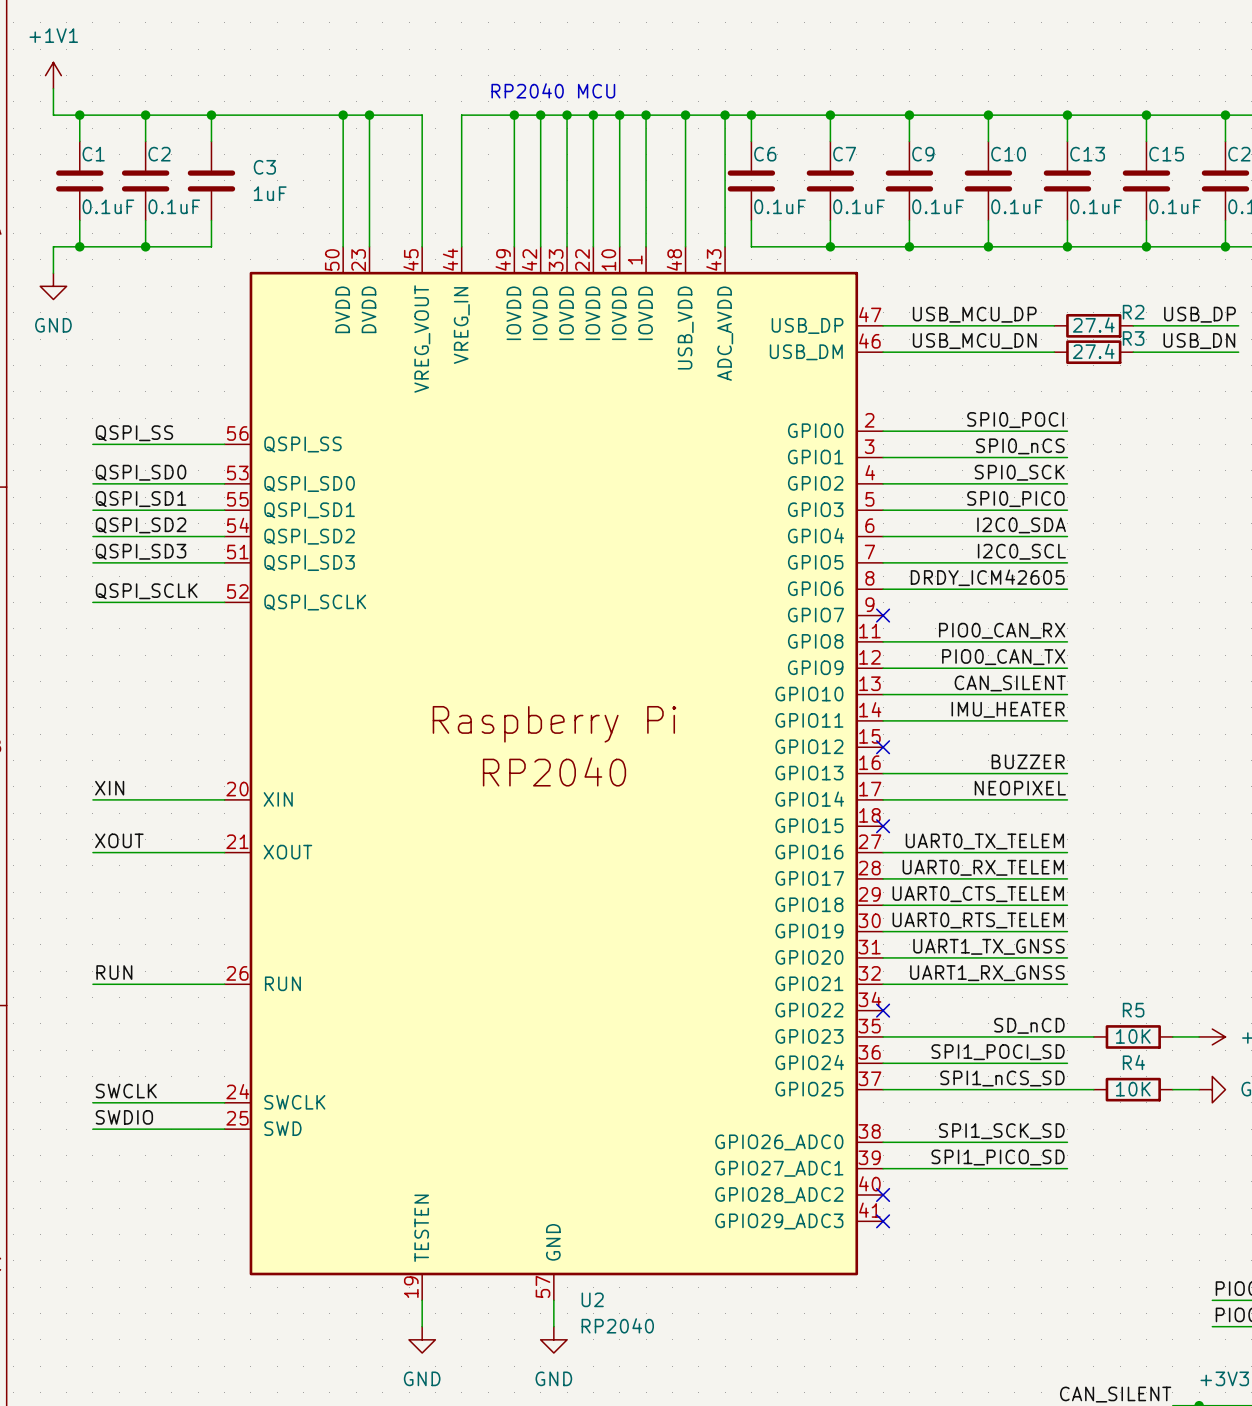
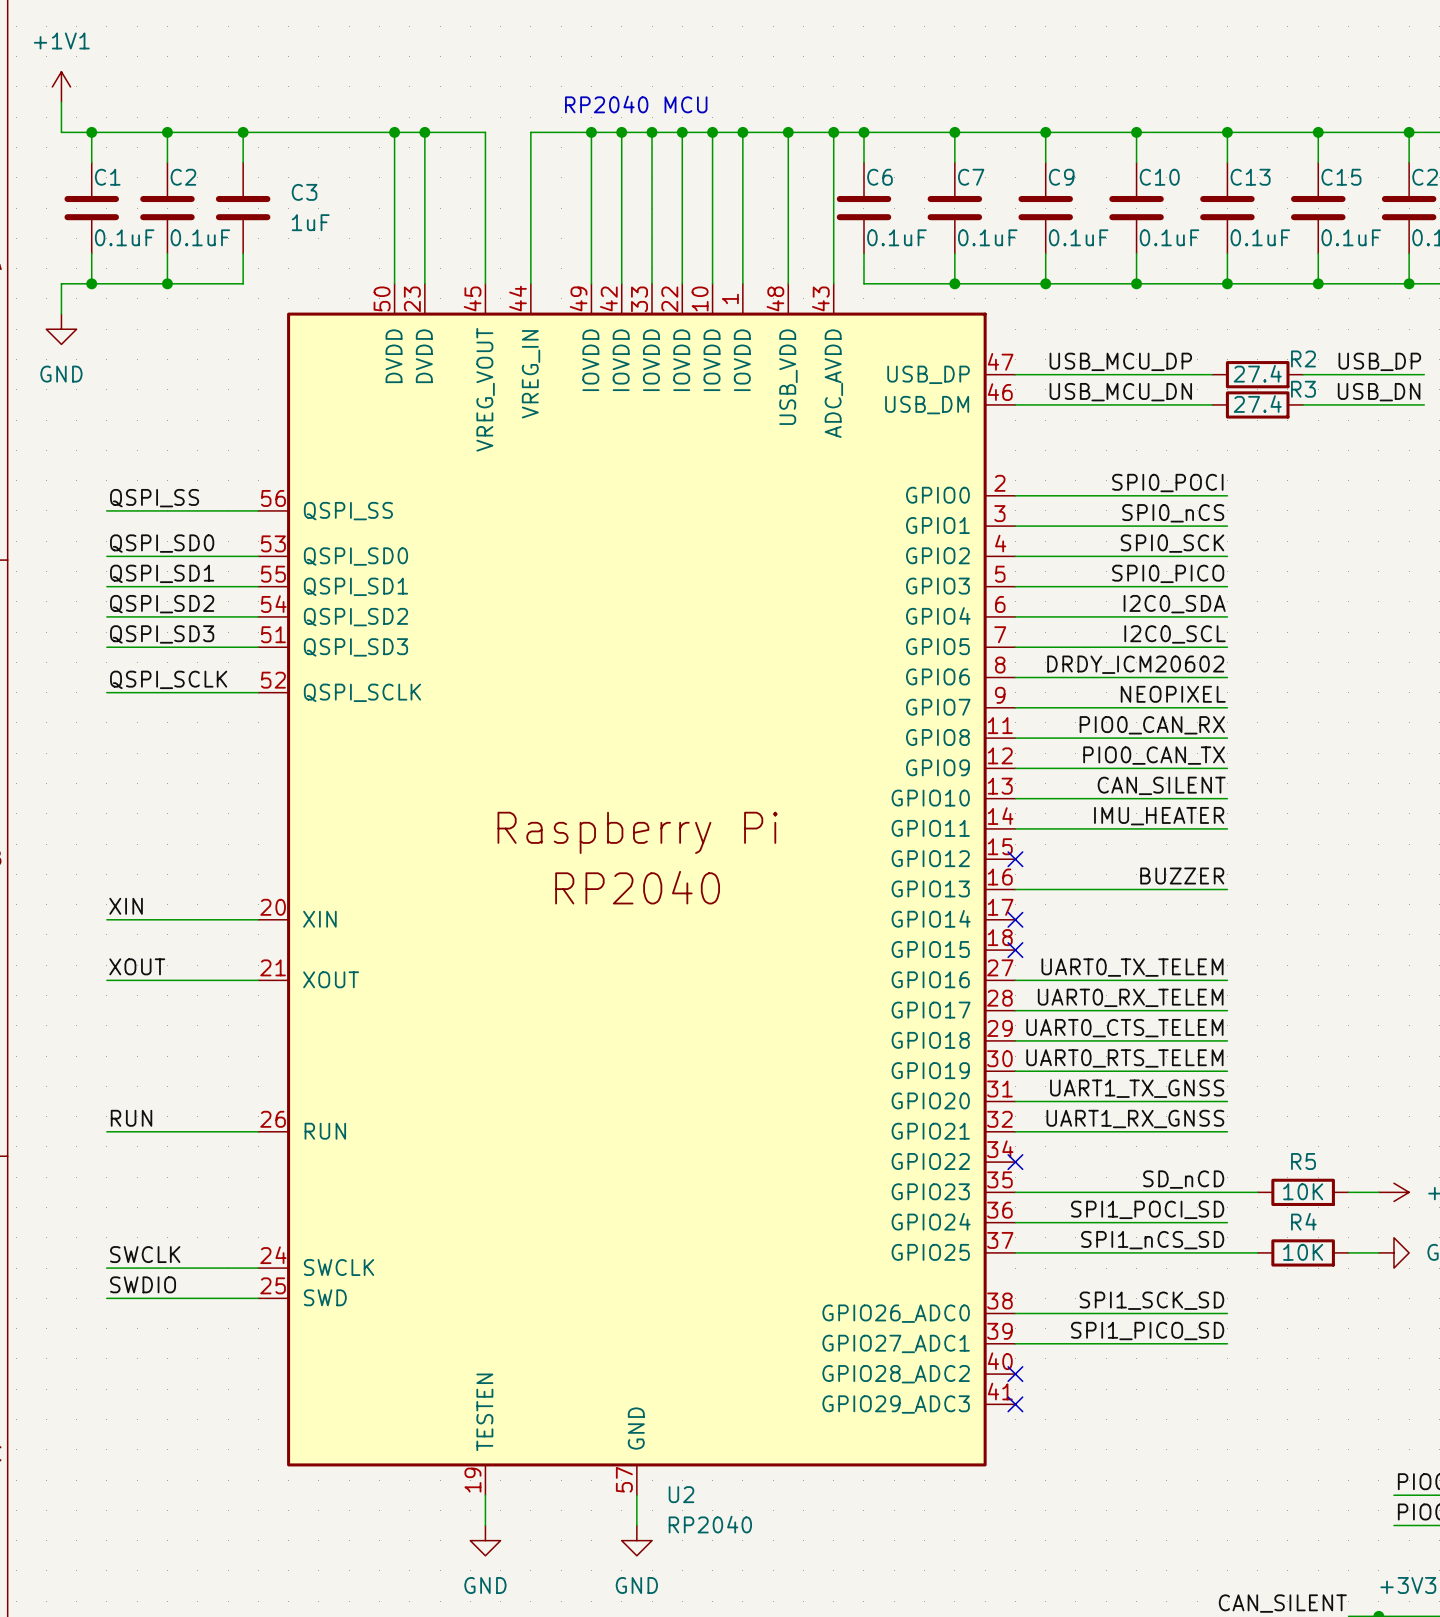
label: DRDY_ICM42605 (987, 577) -> DRDY_ICM20602 (1135, 664)
no-connect mark: (883, 615) -> none
label position: NEOPIXEL (1020, 788) -> NEOPIXEL (1173, 694)
wire: (883, 799) (1067, 799) -> (1015, 707) (1227, 707)
no-connect mark: none -> (1015, 919)

